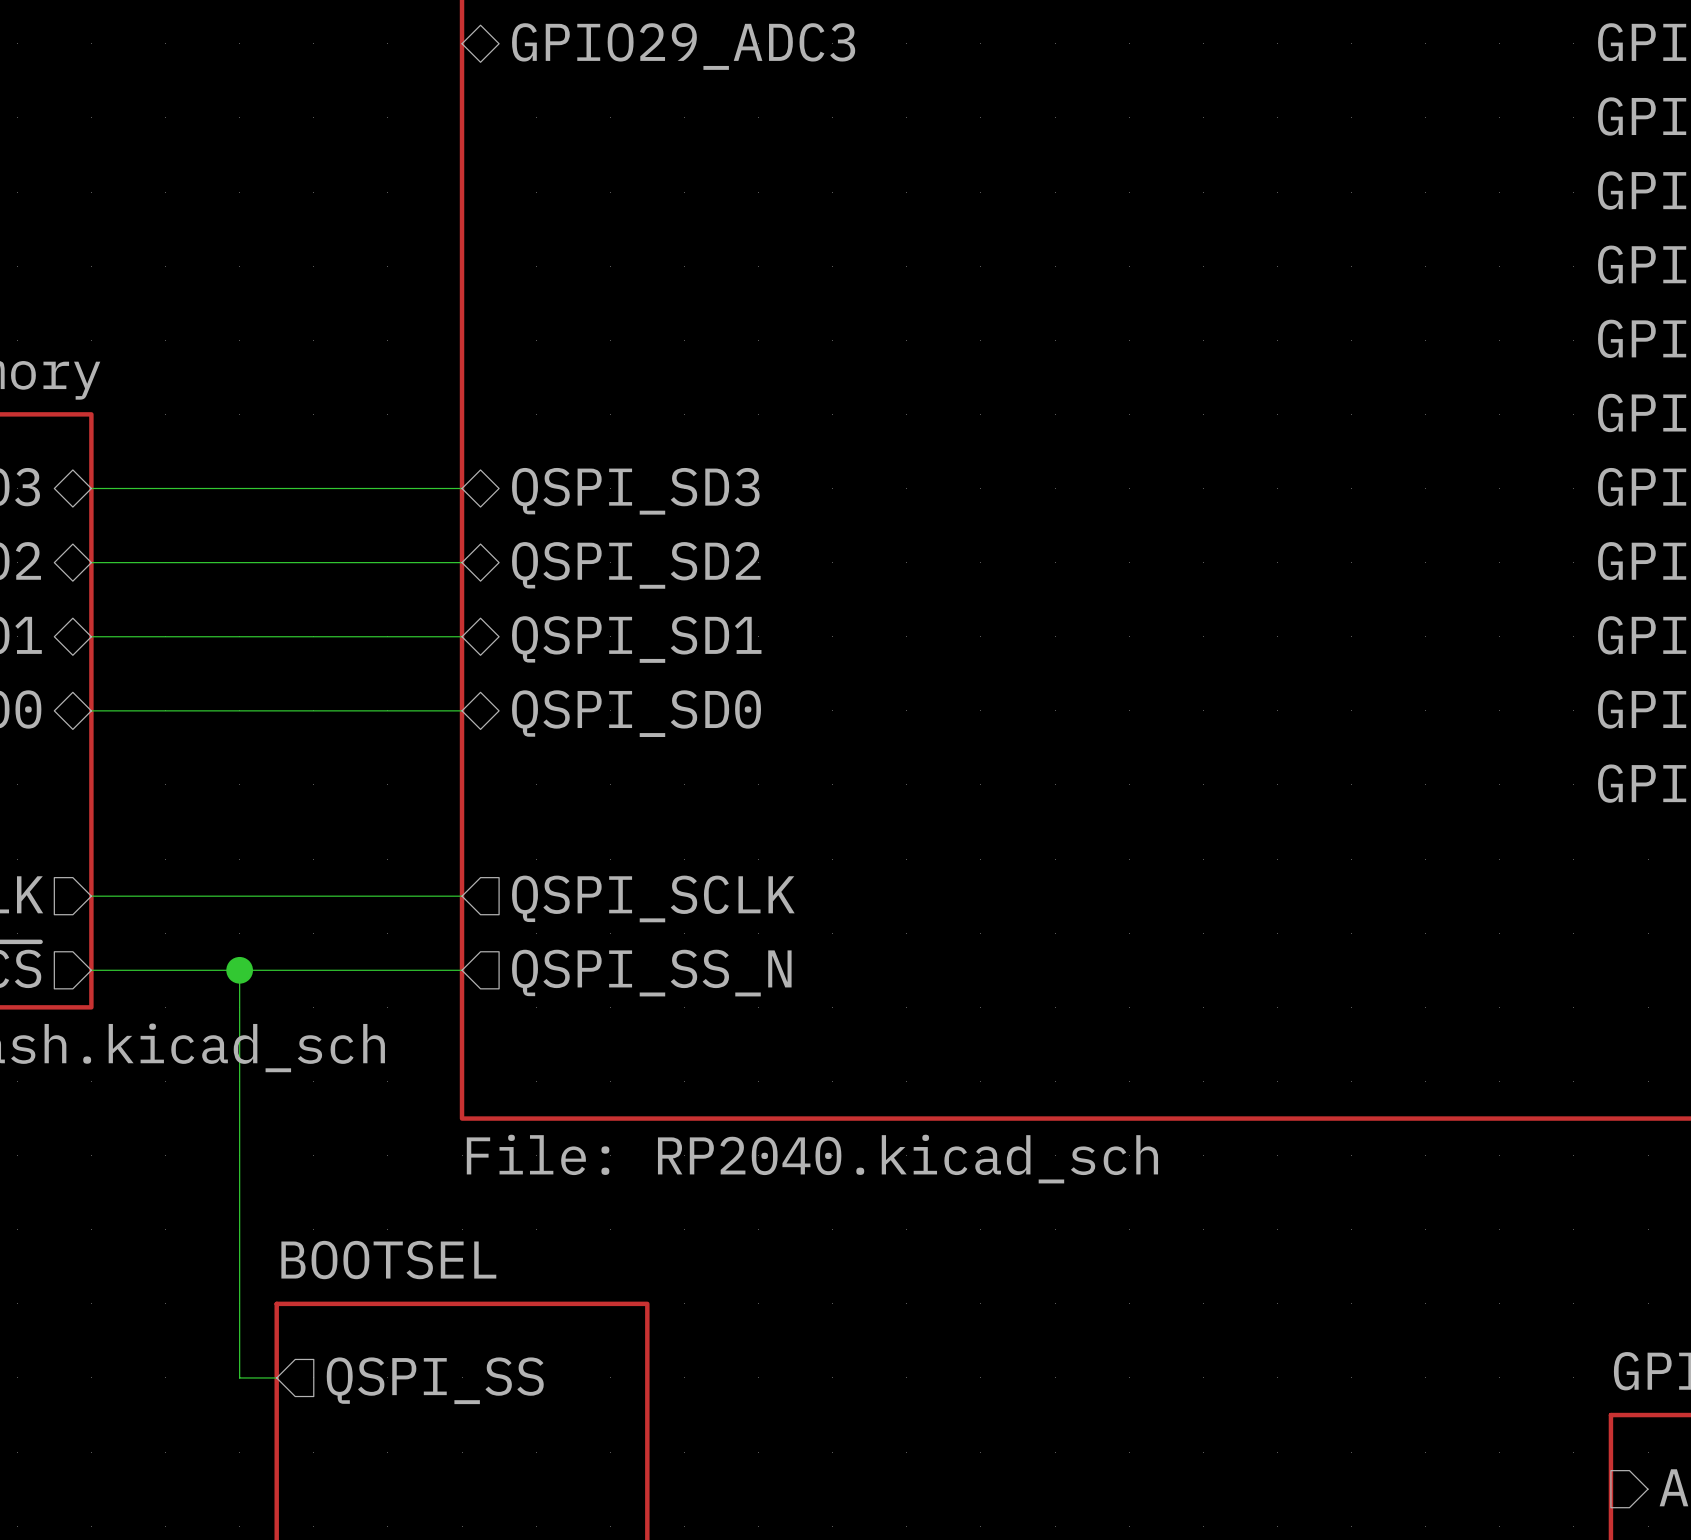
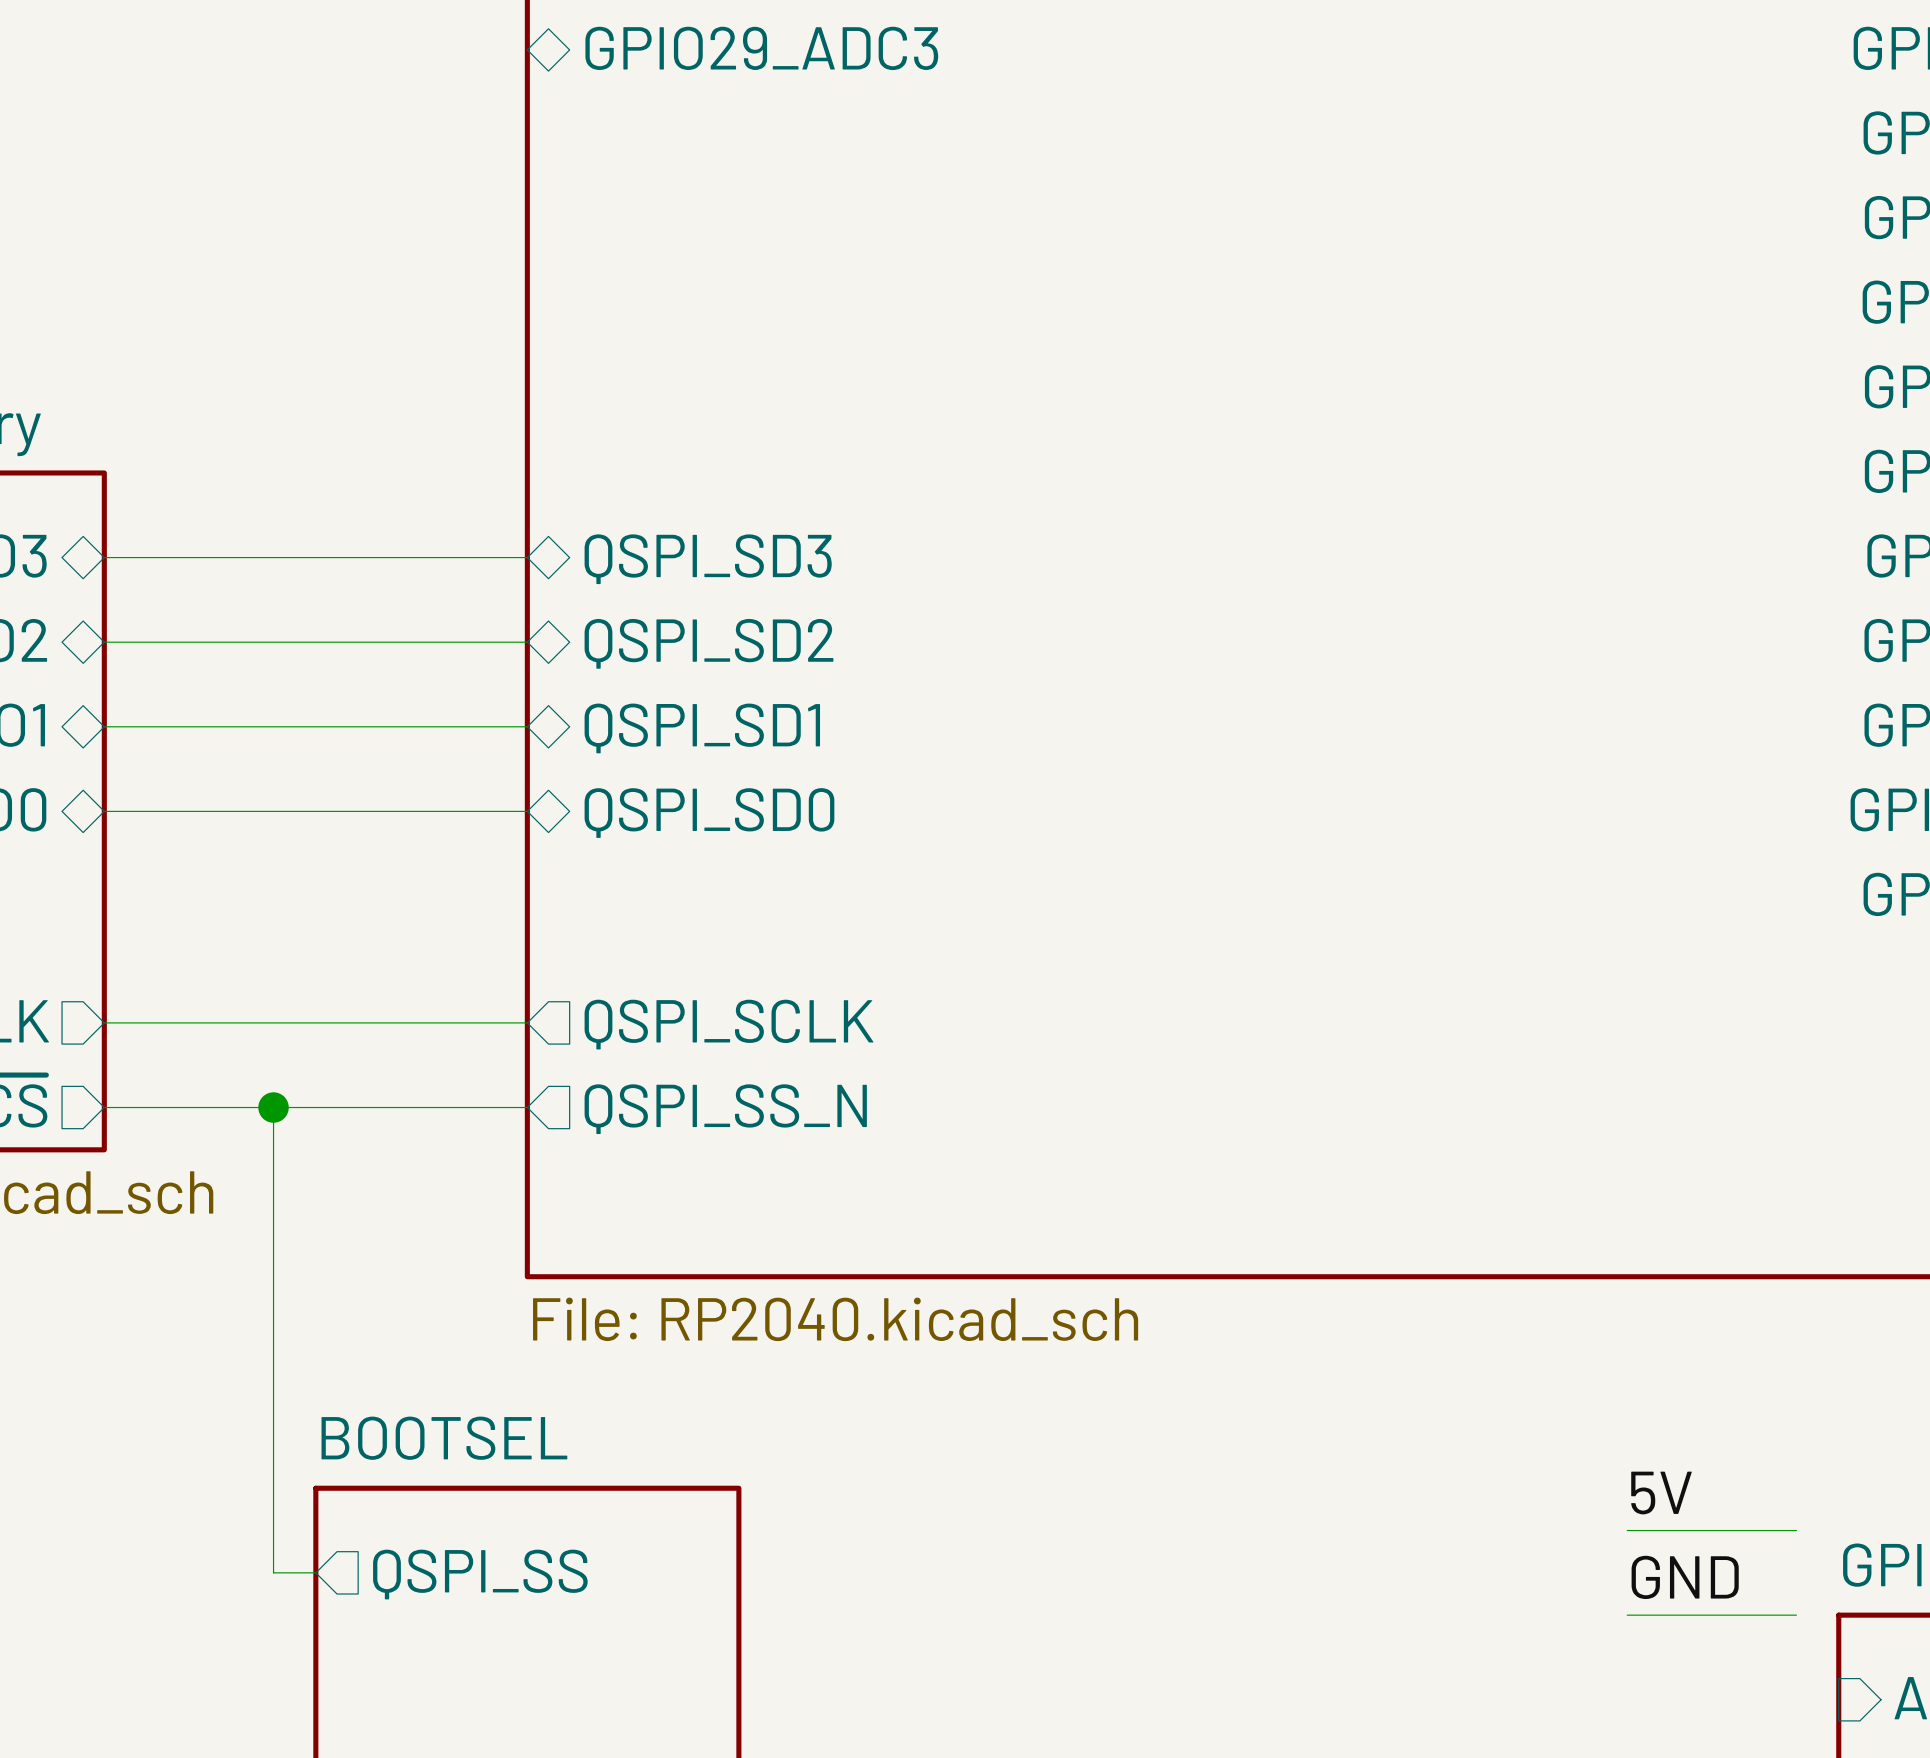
label: none -> 5V (1661, 1493)
wire: none -> (1627, 1530) (1796, 1530)
label: none -> GND (1685, 1577)
wire: none -> (1627, 1615) (1796, 1615)

